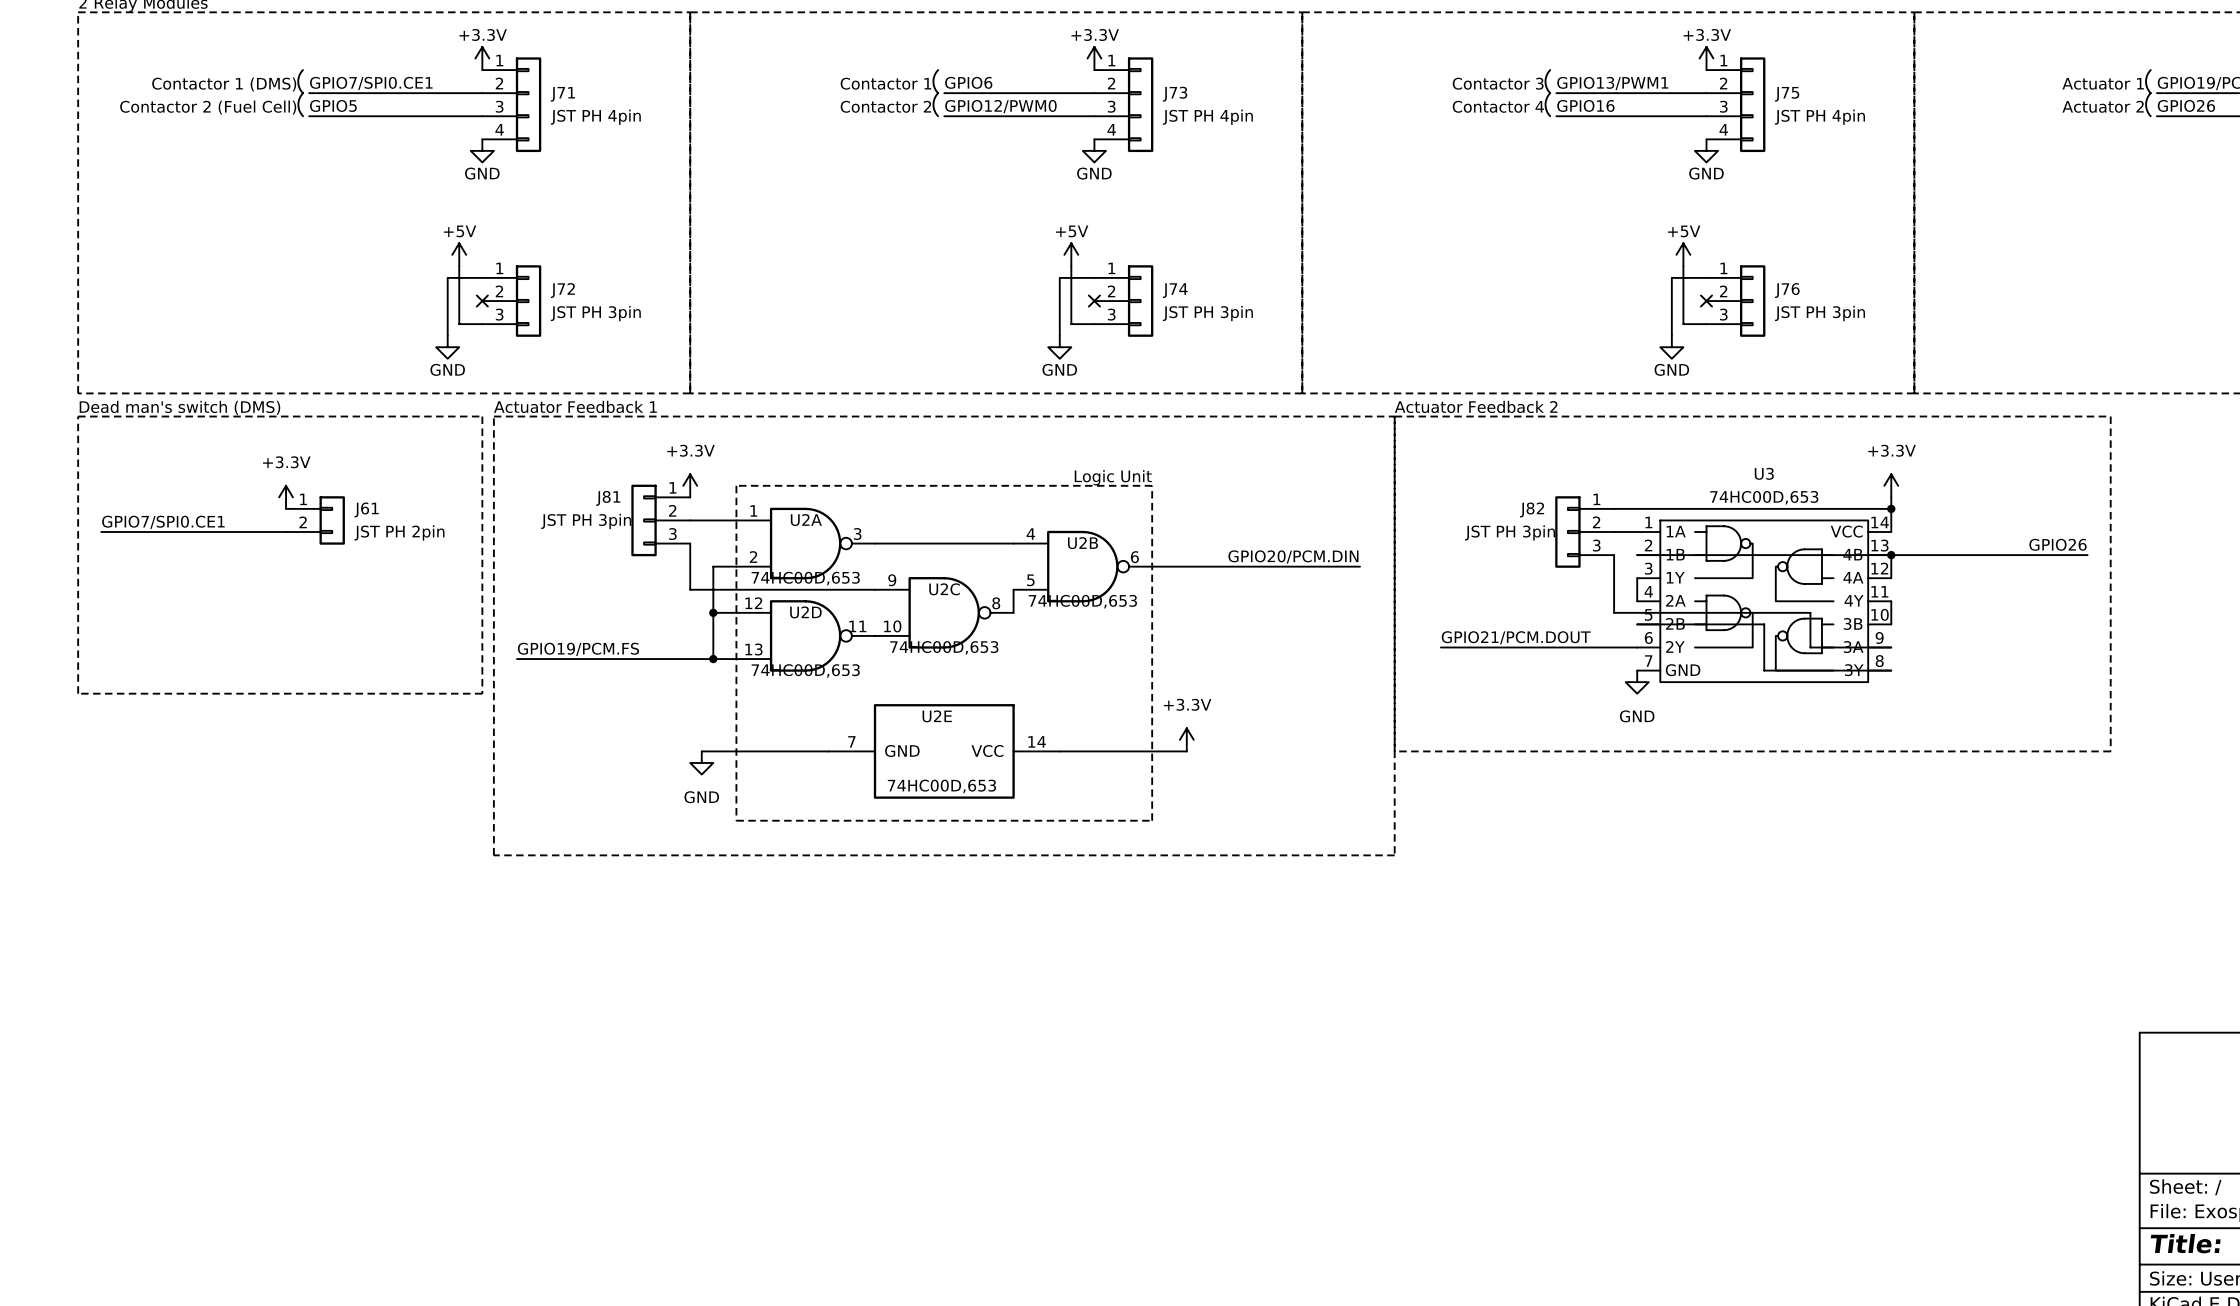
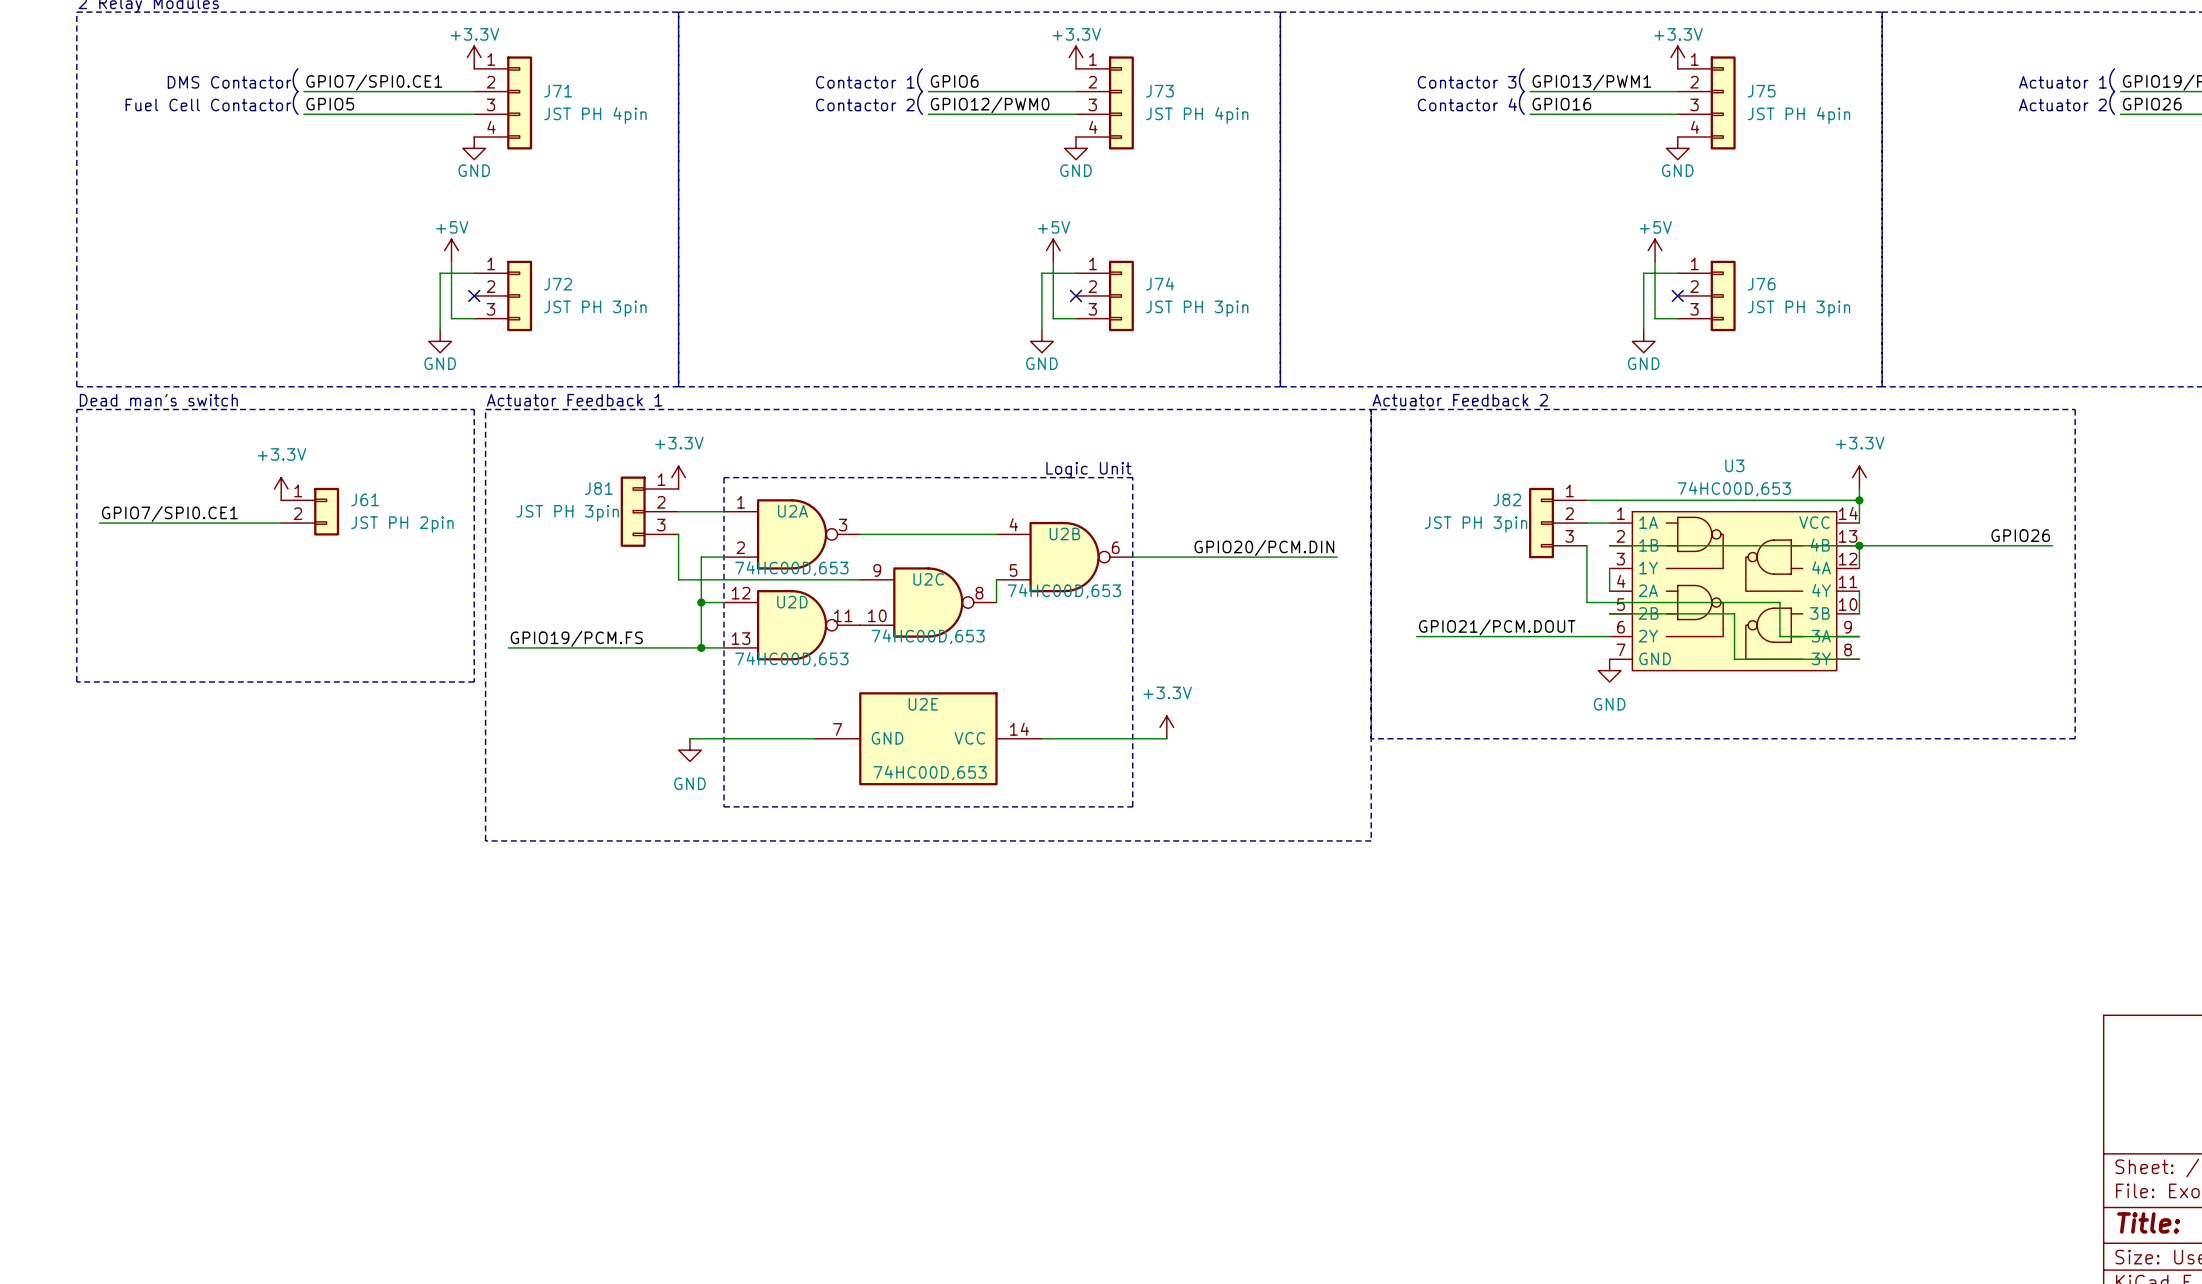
text: Contactor 1 (DMS) (224, 84) -> DMS Contactor (229, 82)
text: Contactor 2 (Fuel Cell) (208, 107) -> Fuel Cell Contactor (208, 104)
text: Dead man's switch (DMS) (179, 407) -> Dead man's switch (158, 400)

